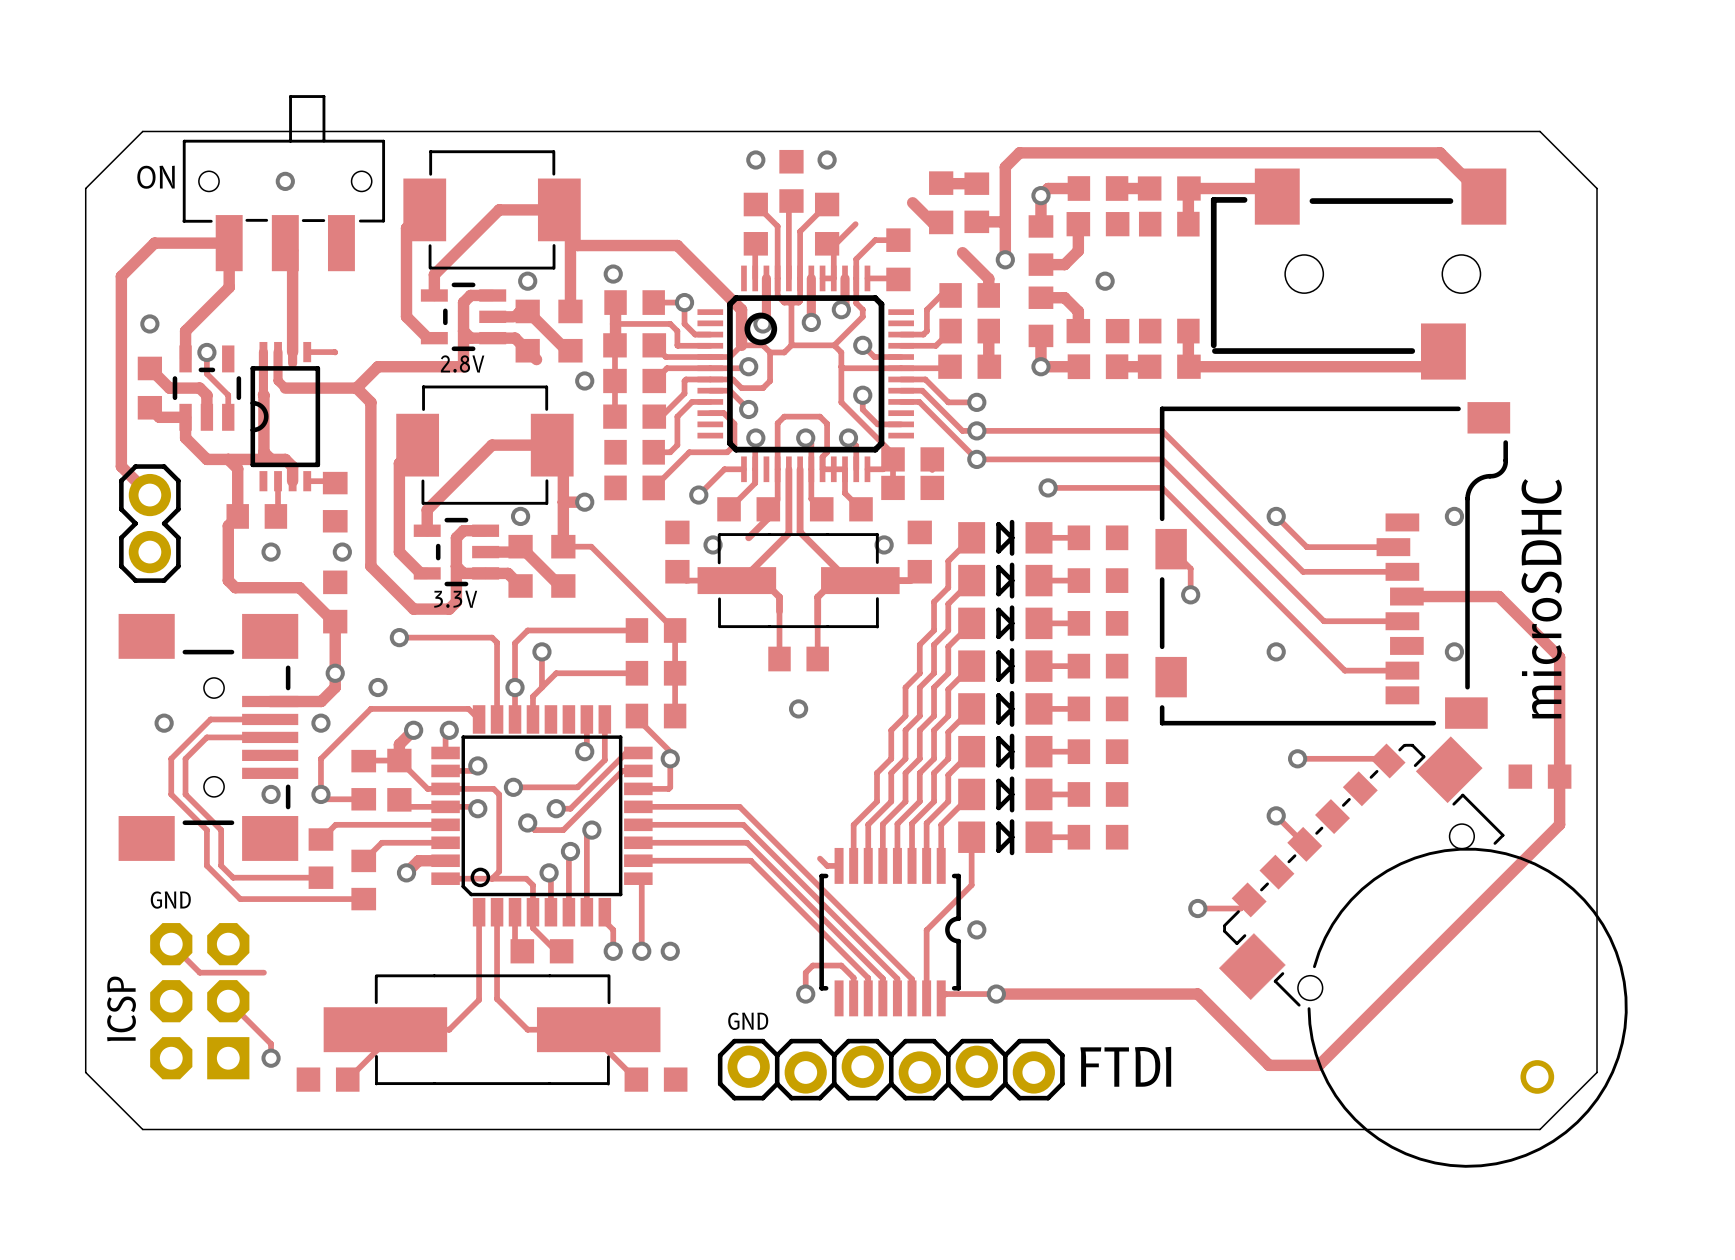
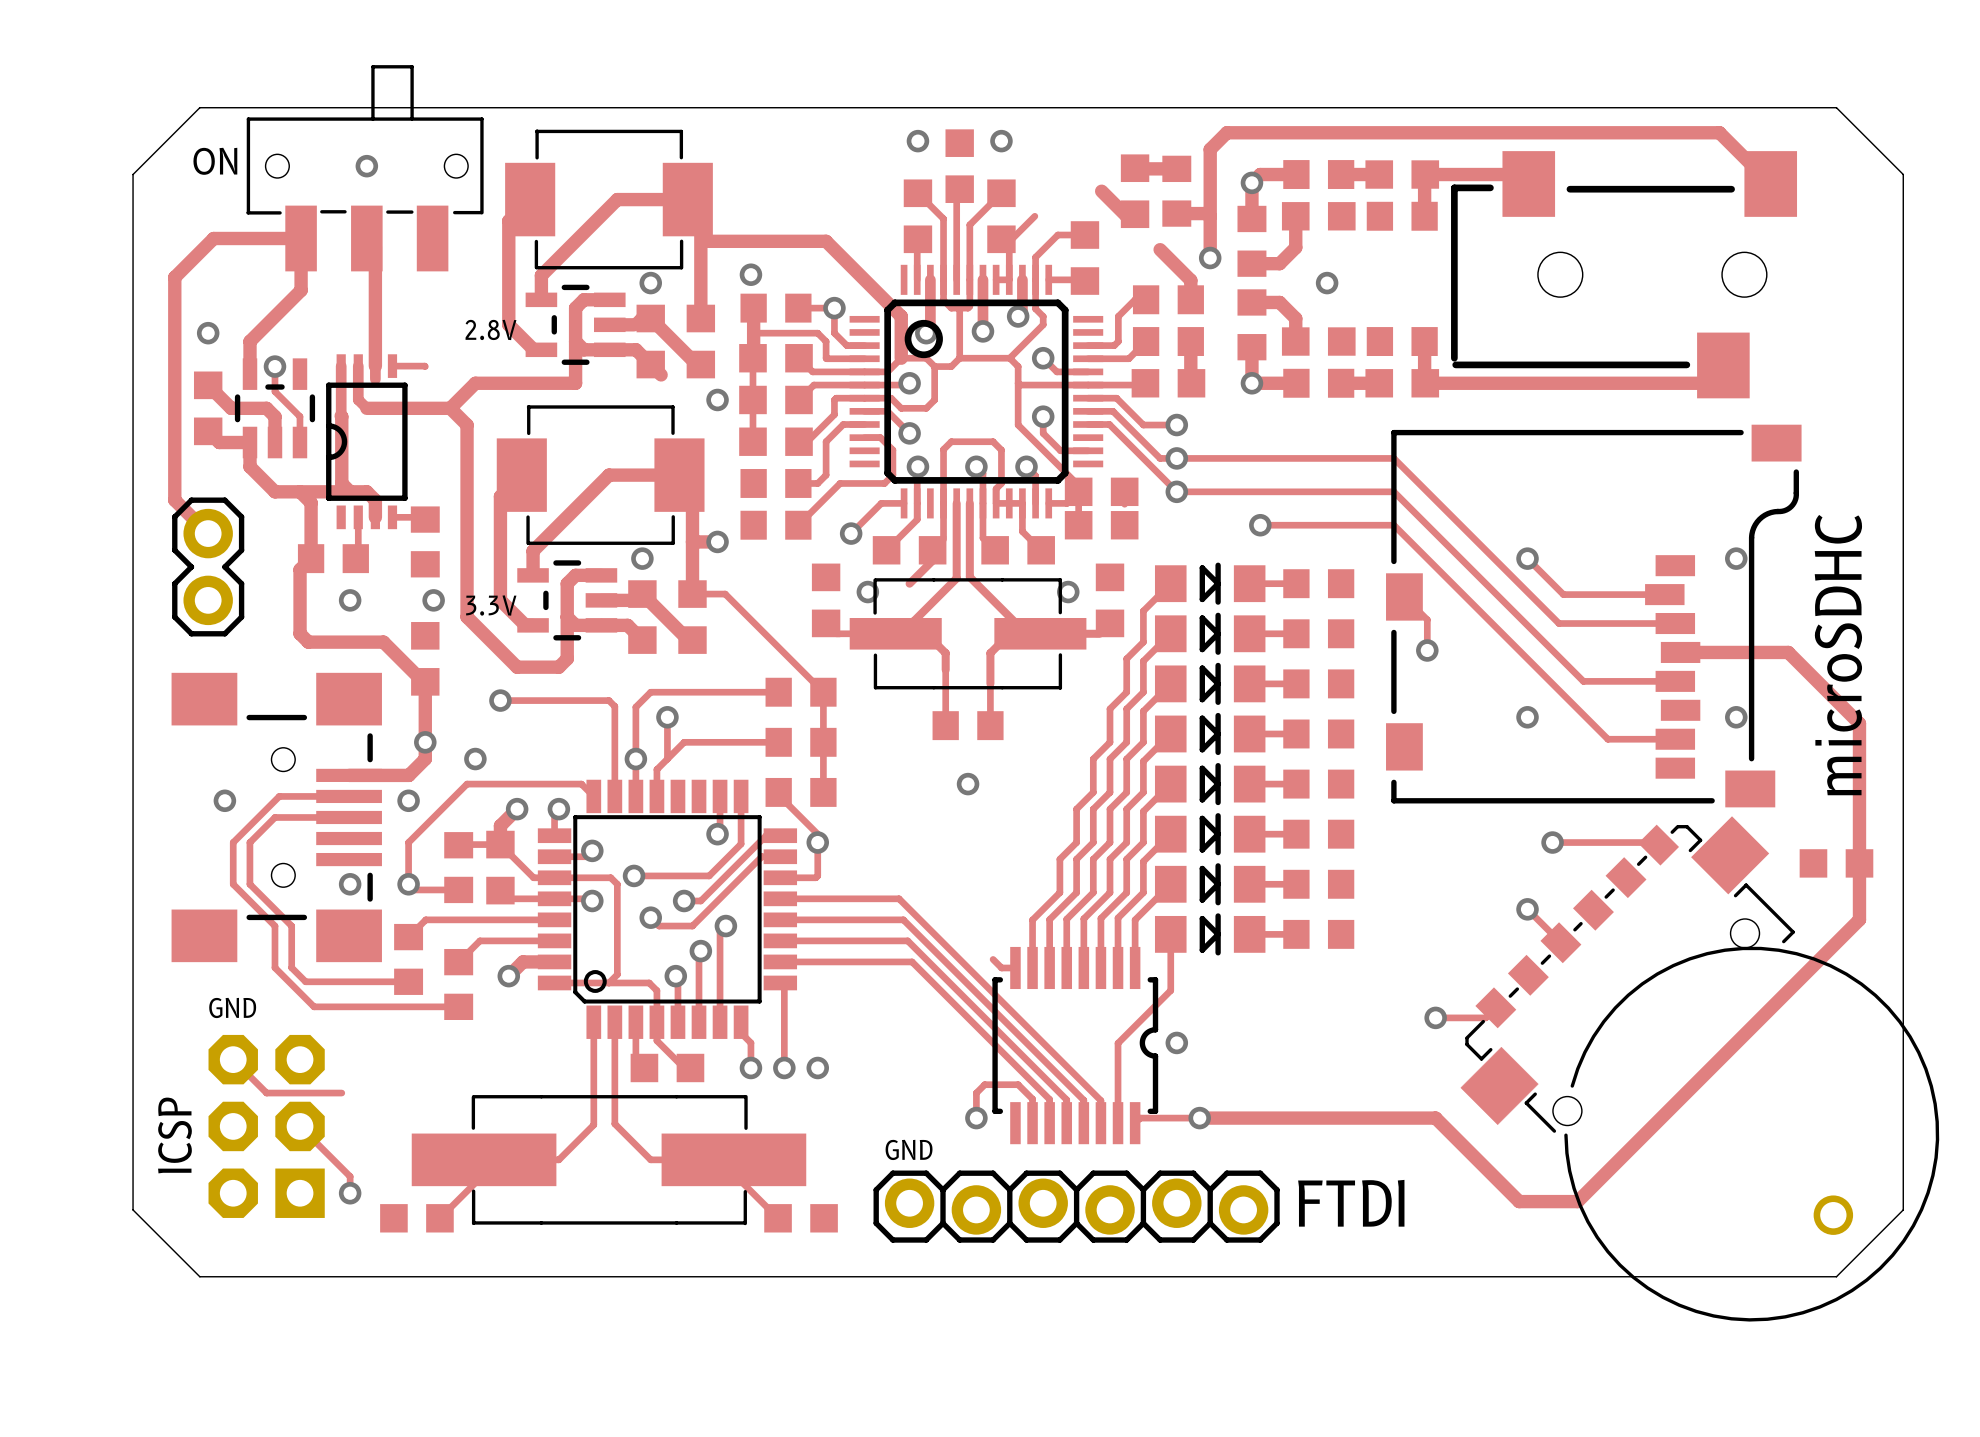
part value position: 2.8V (462, 363) -> 2.8V (490, 329)
part value position: 3.3V (455, 599) -> 3.3V (491, 605)

